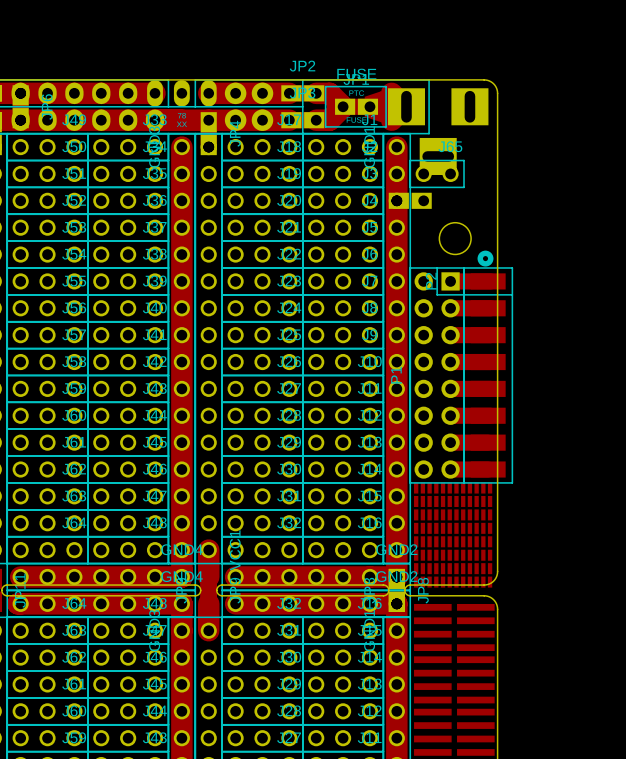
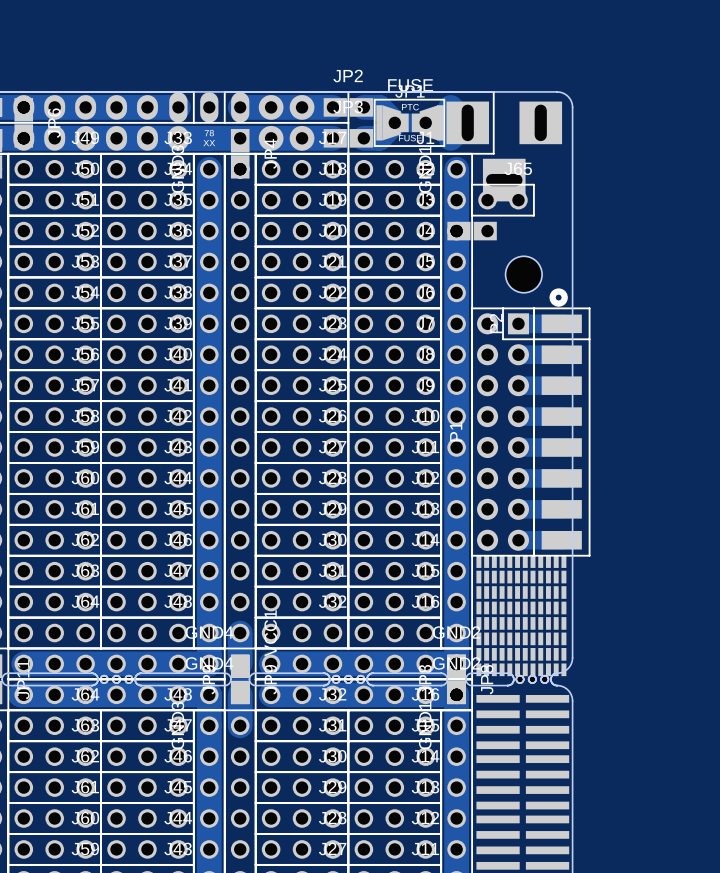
board edge: (79, 585) (122, 585) -> none
board edge: (281, 585) (324, 585) -> none
board edge: (441, 585) (484, 585) -> none
part: none -> (116, 679)
part: none -> (348, 679)
part: none -> (532, 679)
board edge: (79, 595) (122, 595) -> none
board edge: (281, 595) (324, 595) -> none
board edge: (441, 595) (487, 596) (494, 601) (497, 609) -> (557, 685) (568, 690) (572, 701)

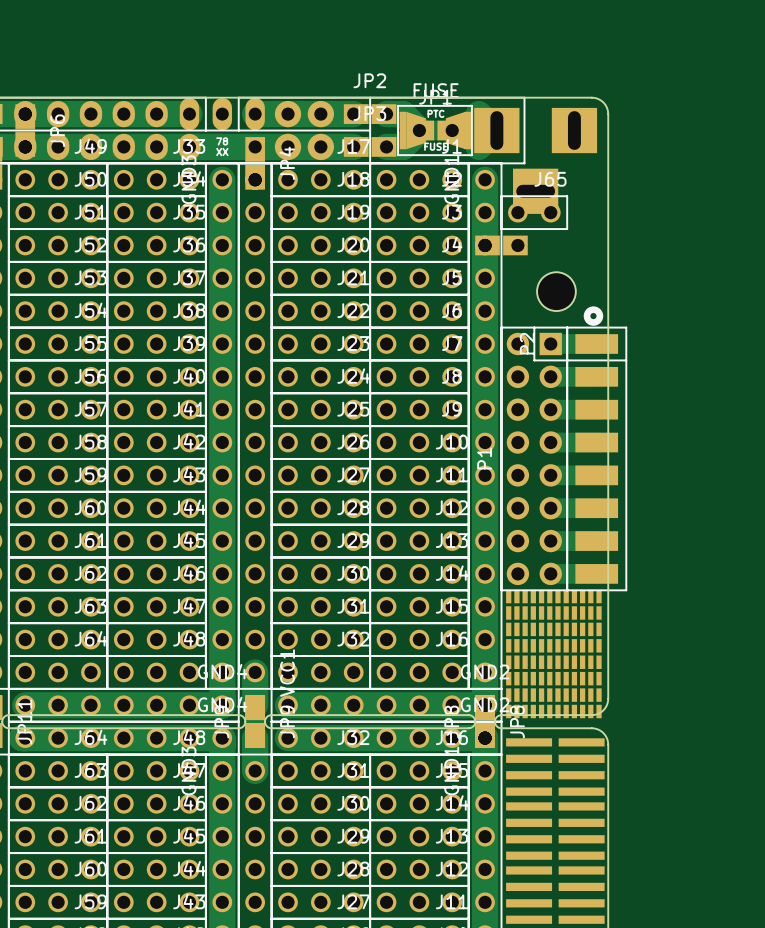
board edge: none -> (97, 715) (150, 715)
board edge: none -> (343, 715) (396, 715)
board edge: none -> (539, 715) (591, 715)
part: (116, 679) -> none
part: (348, 679) -> none
part: (532, 679) -> none
board edge: none -> (97, 728) (150, 728)
board edge: none -> (343, 728) (396, 728)
board edge: (557, 685) (568, 690) (572, 701) -> (539, 728) (596, 728) (604, 734) (608, 744)

